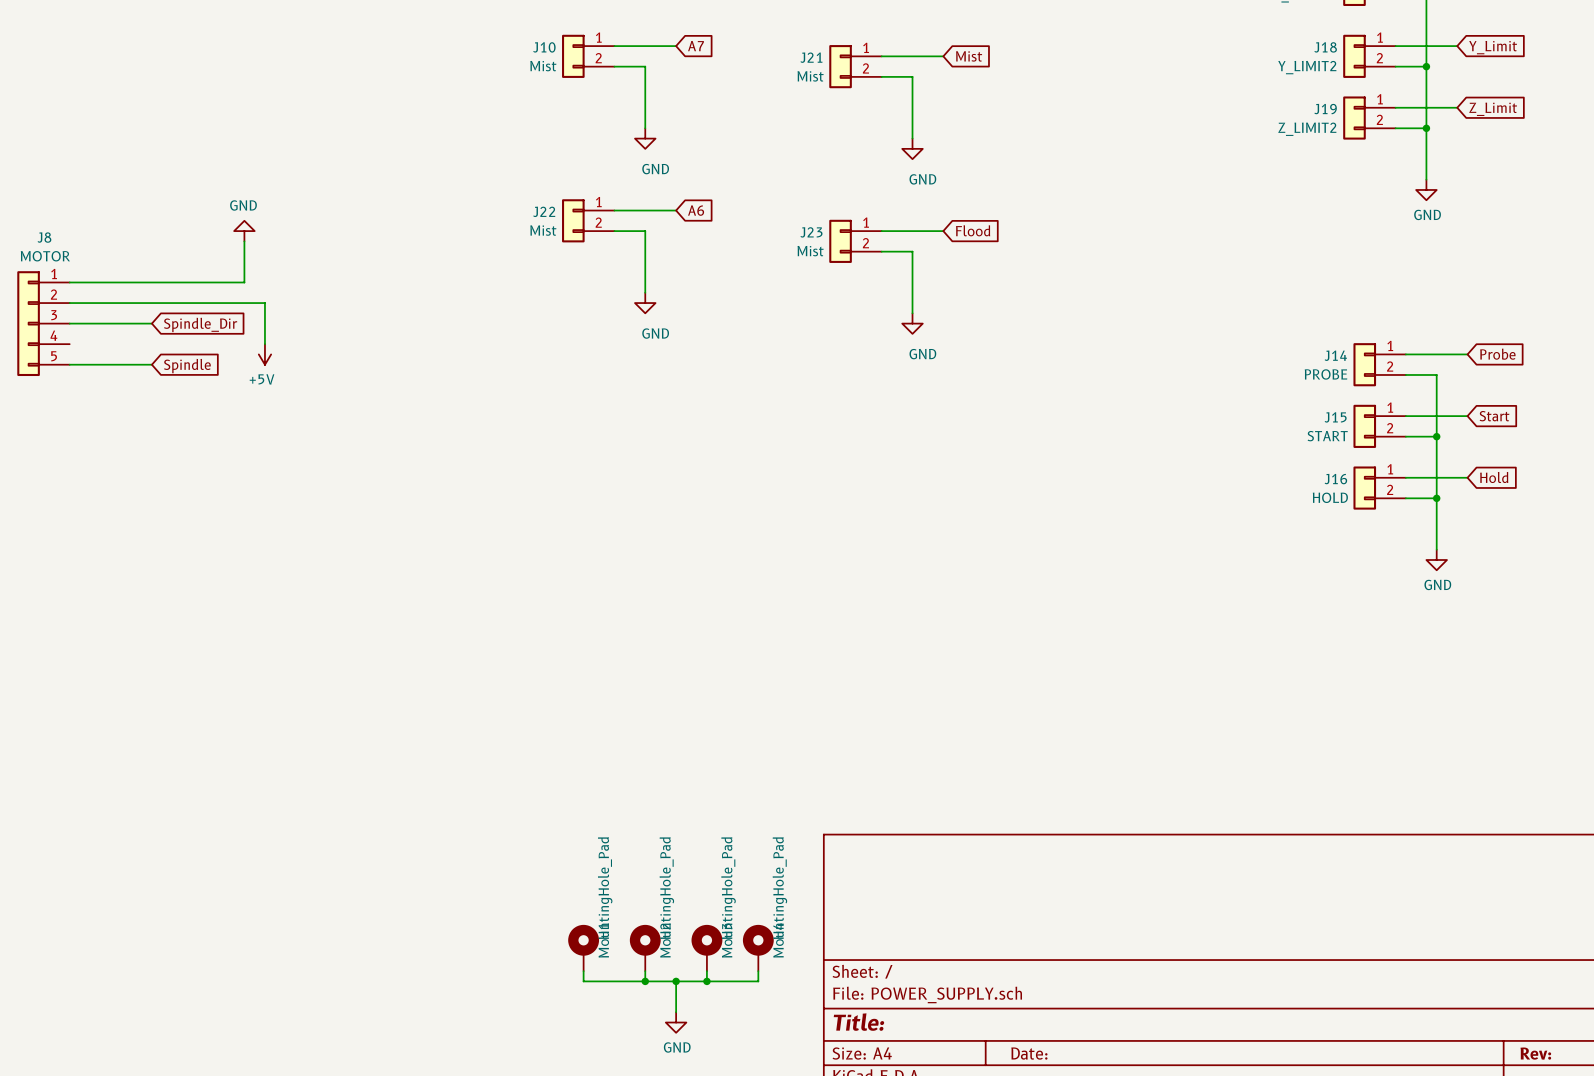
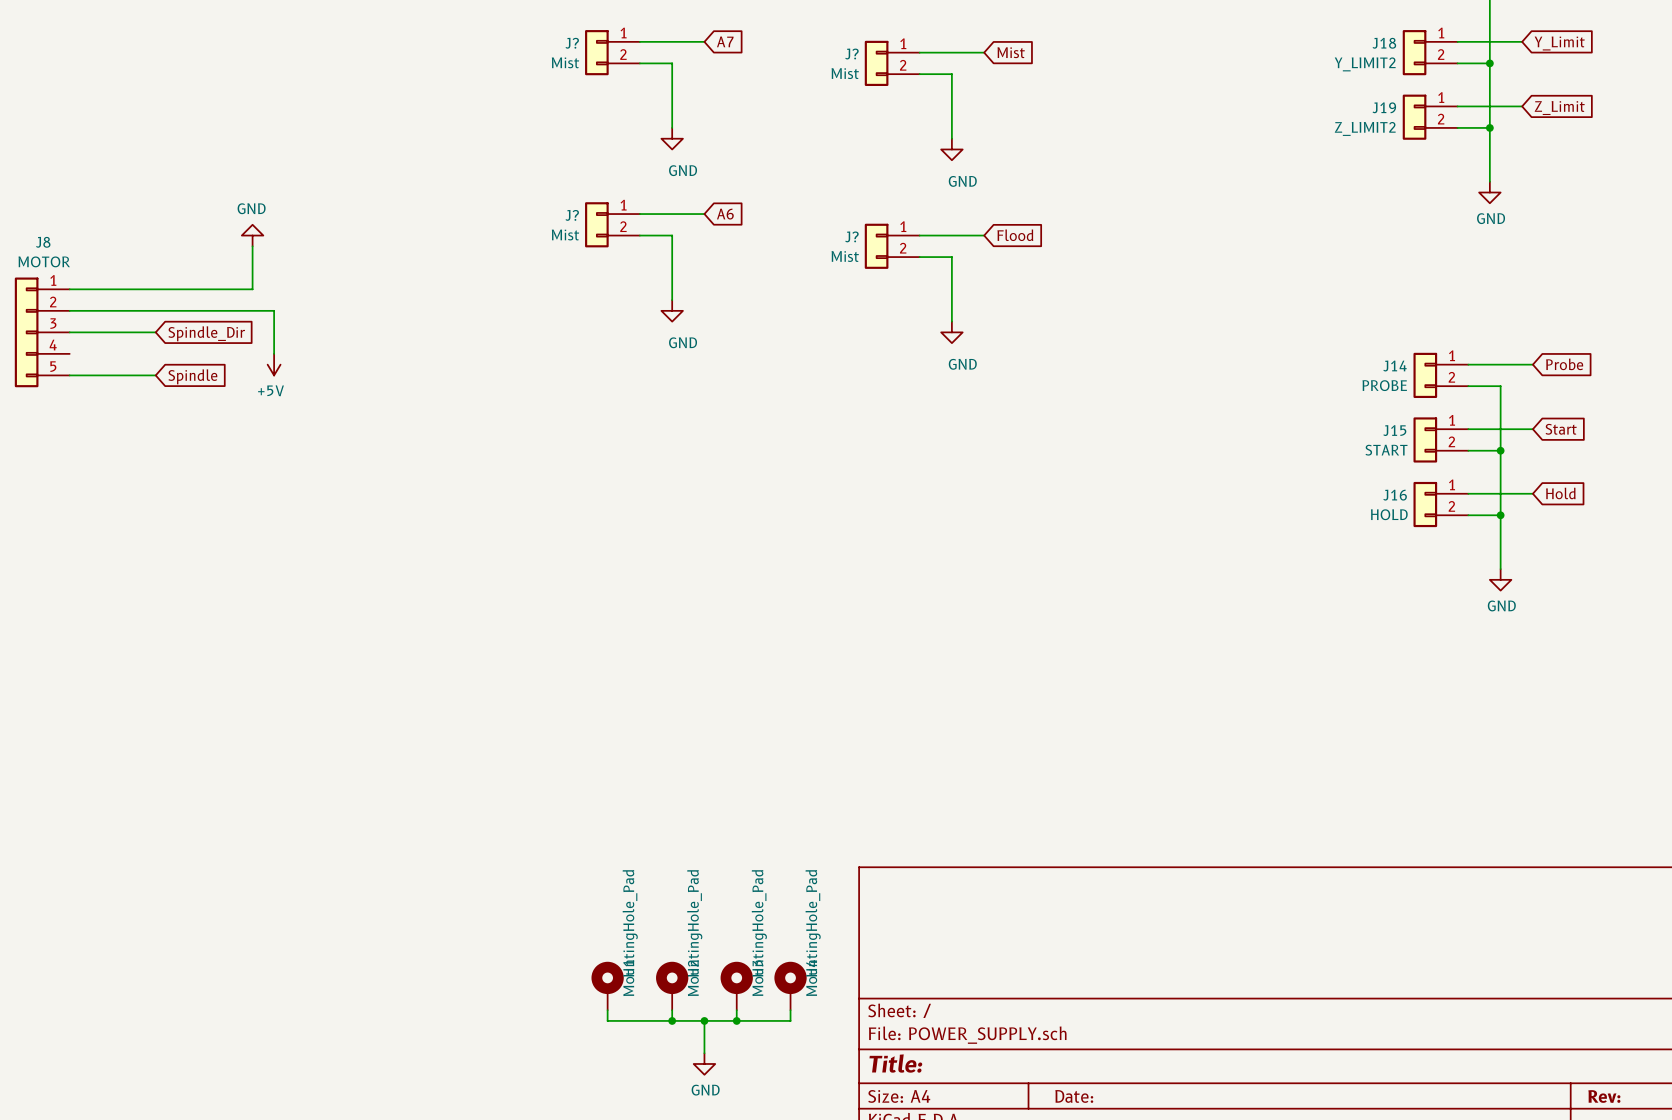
J10 name: J10 (544, 47) -> J? (572, 43)
J21 name: J21 (811, 57) -> J? (851, 54)
J22 name: J22 (544, 211) -> J? (572, 215)
J23 name: J23 (811, 232) -> J? (851, 236)

